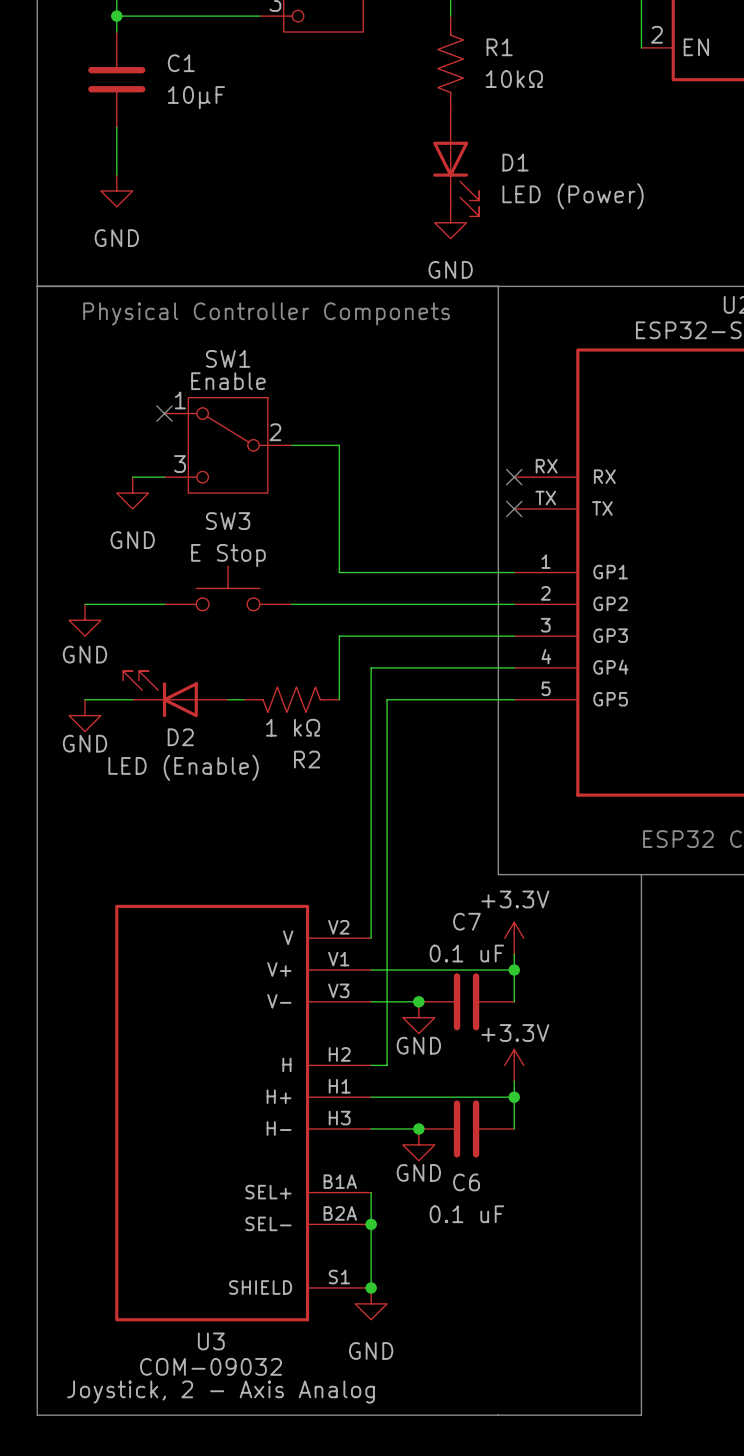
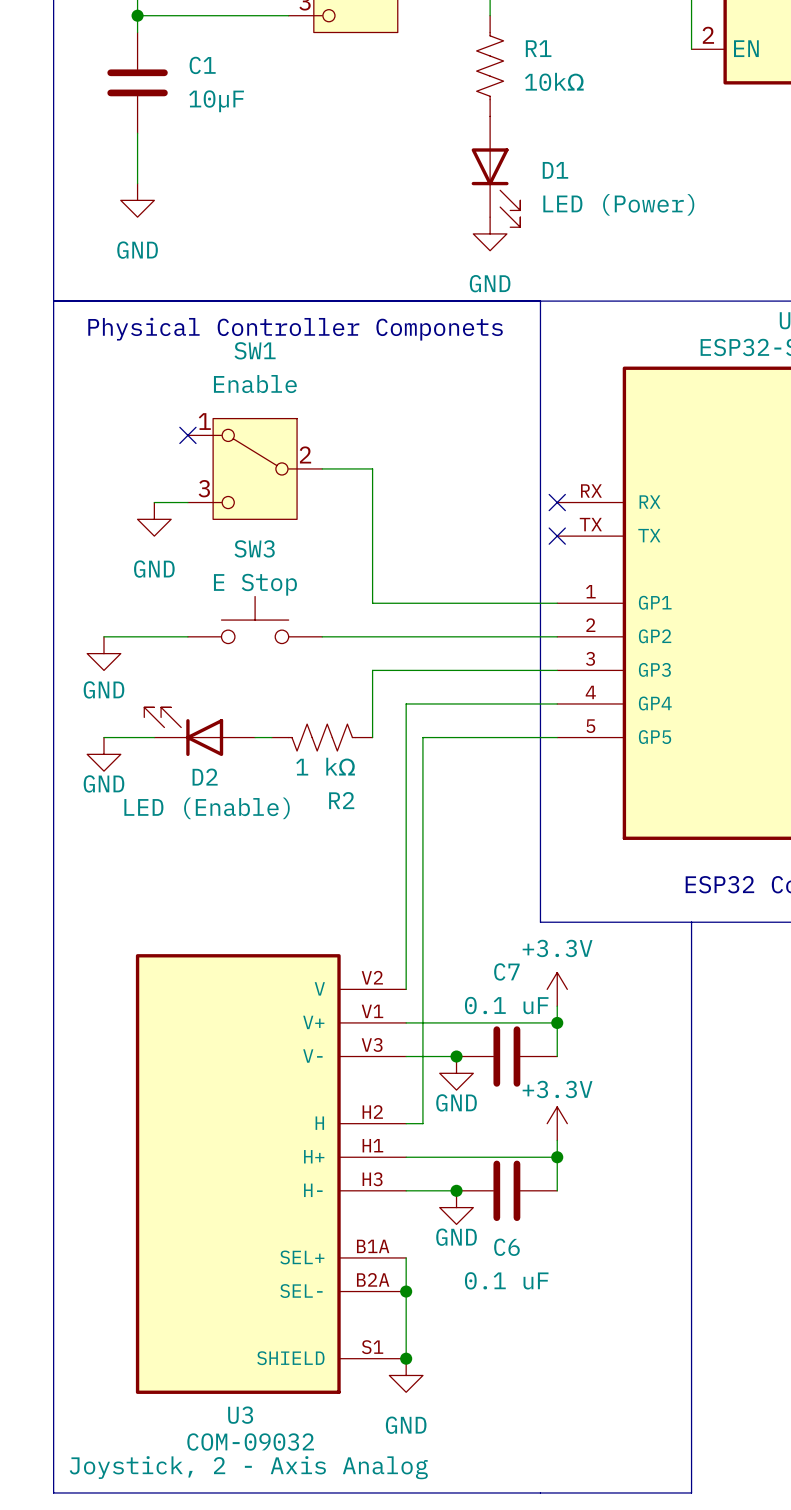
SW1 name position: SW1 (228, 358) -> SW1 (255, 350)
SW1 value position: Enable (228, 381) -> Enable (255, 384)

